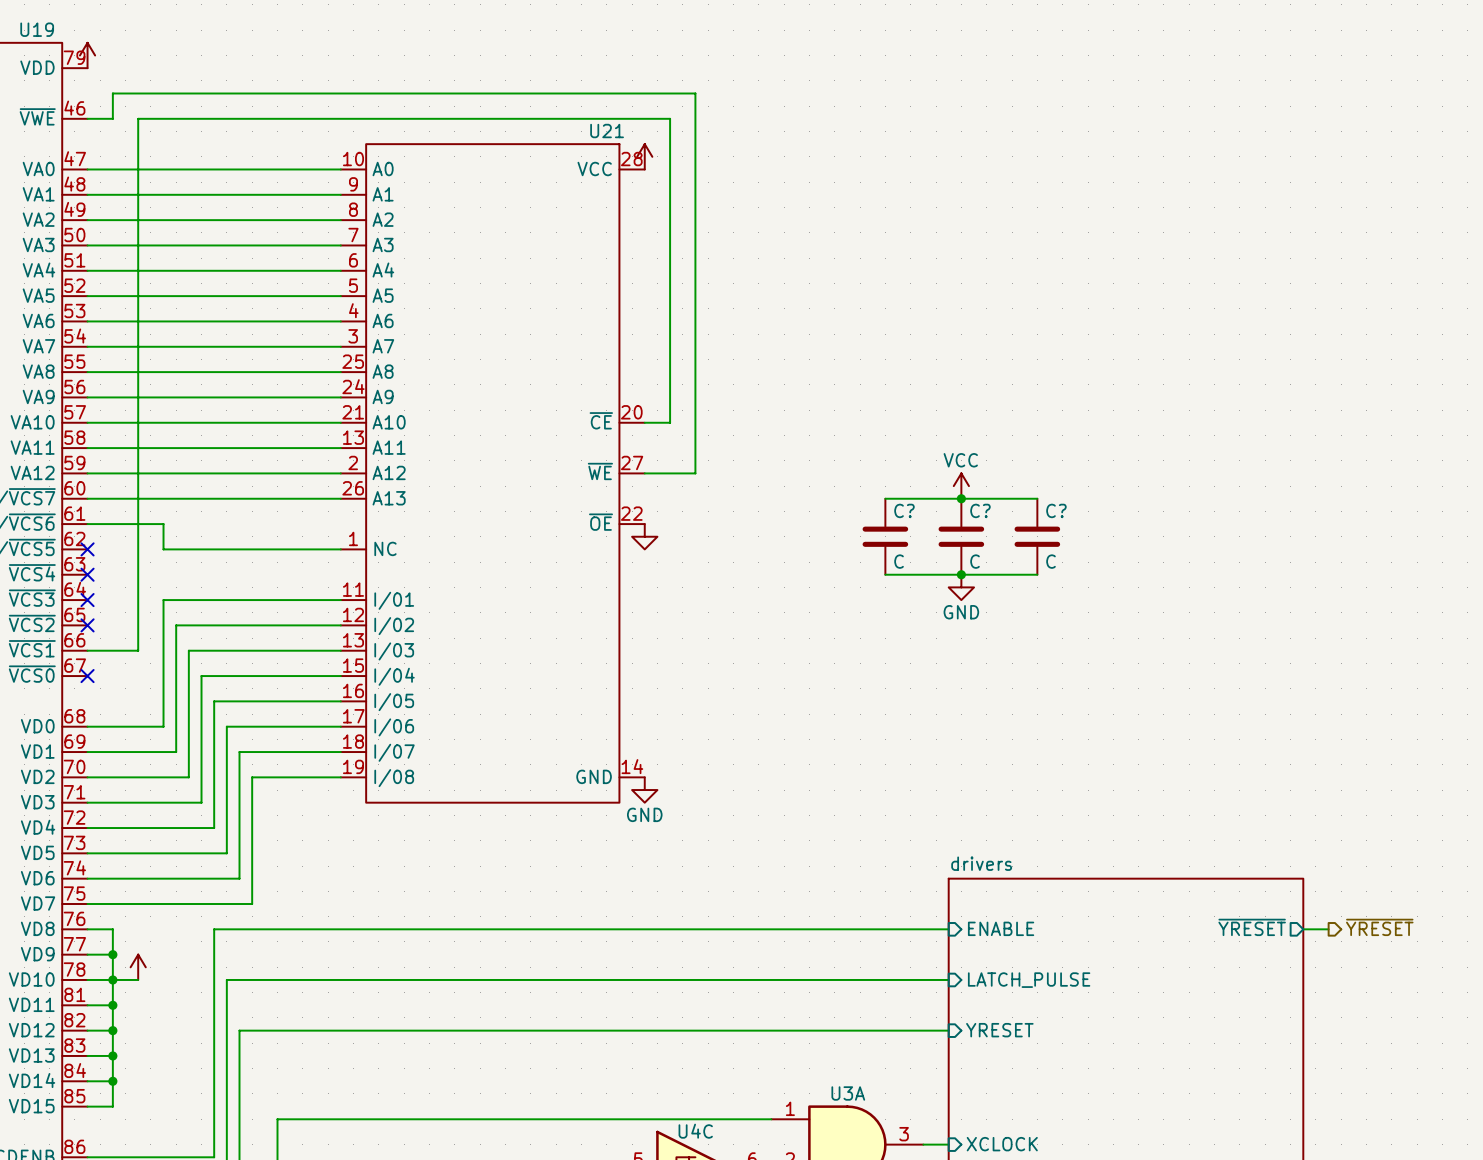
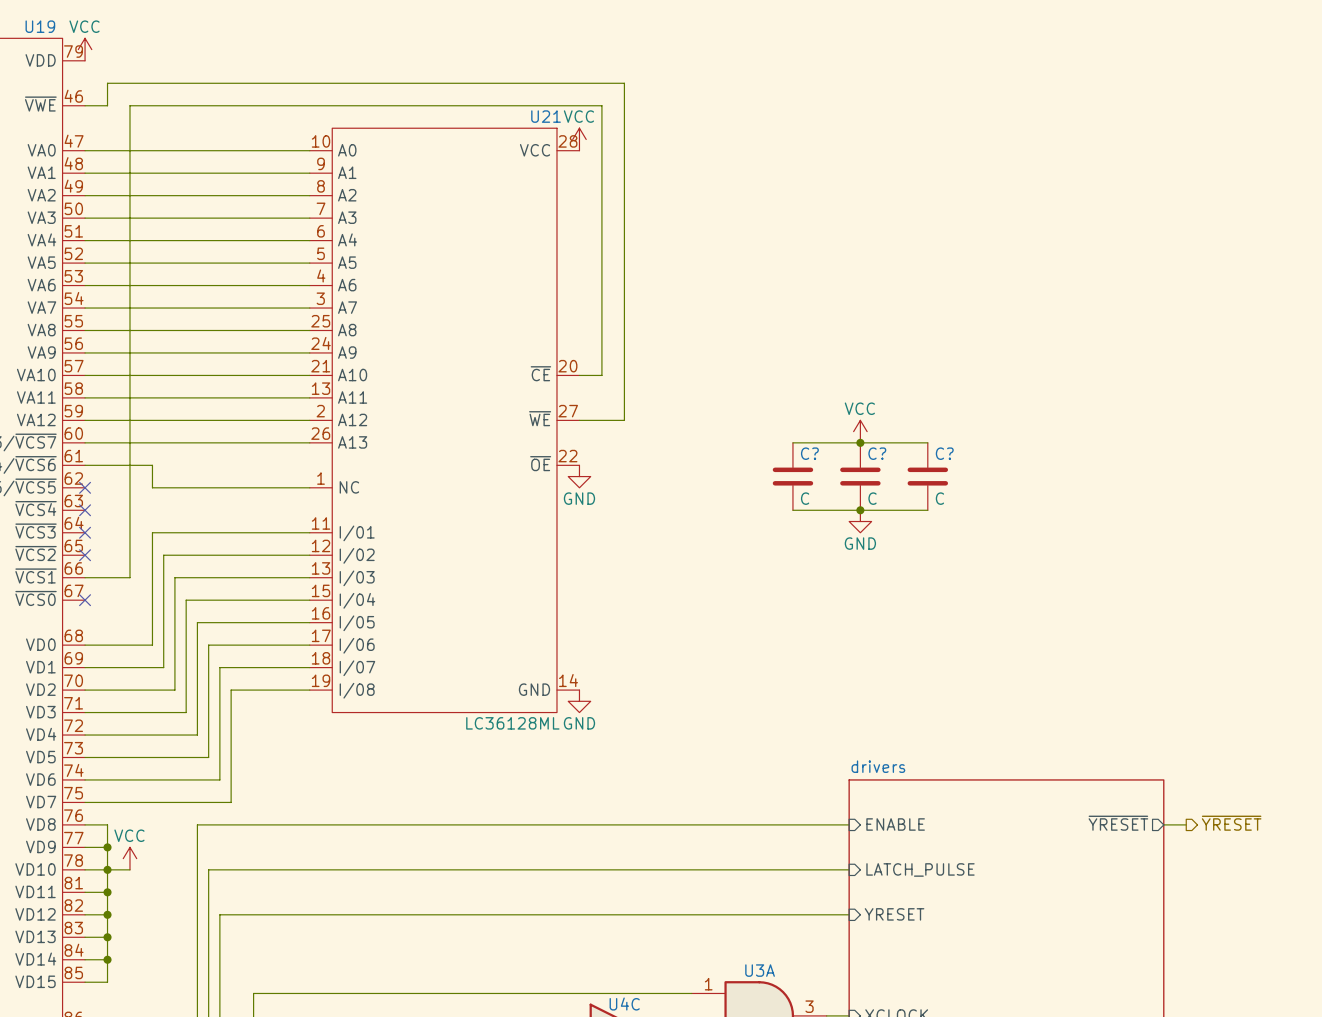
power symbol text: none -> VCC (84, 26)
power symbol text: none -> VCC (578, 116)
power symbol text: none -> GND (579, 498)
U21 value: none -> LC36128ML (512, 723)
power symbol text: none -> VCC (129, 835)

